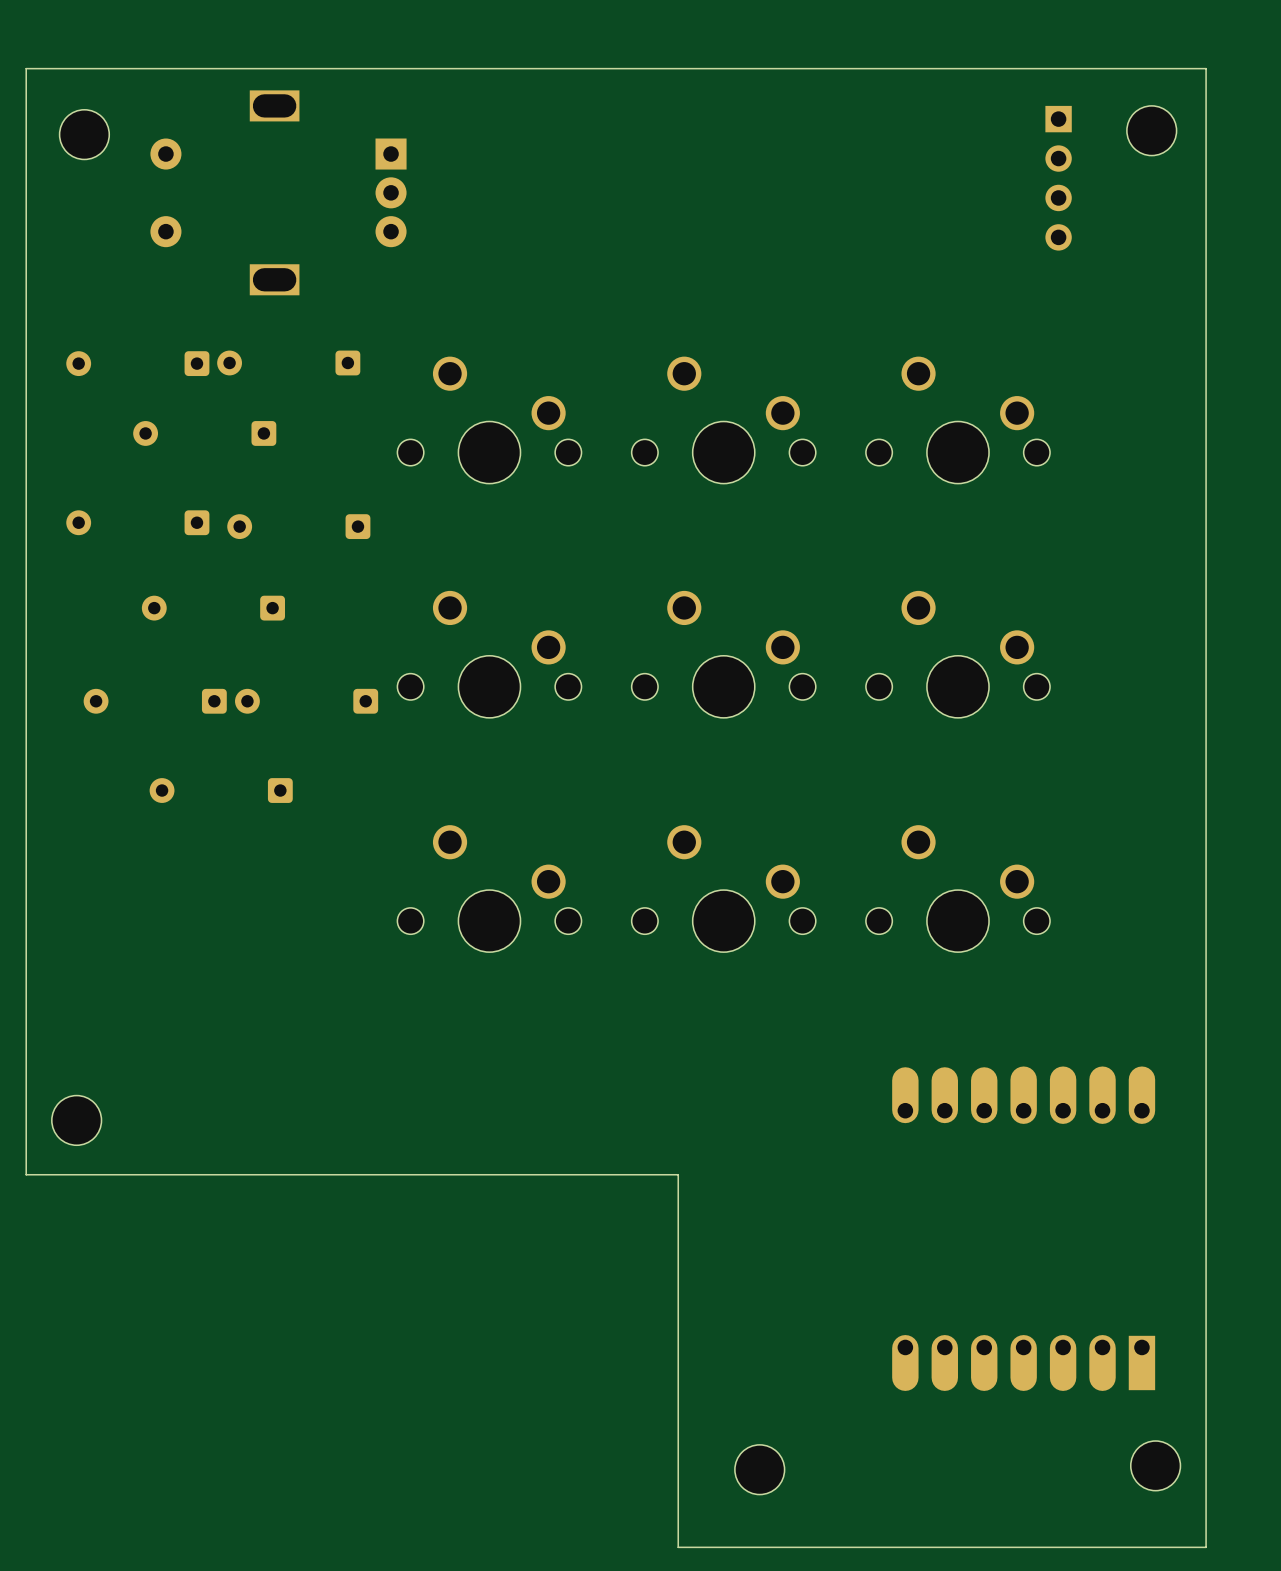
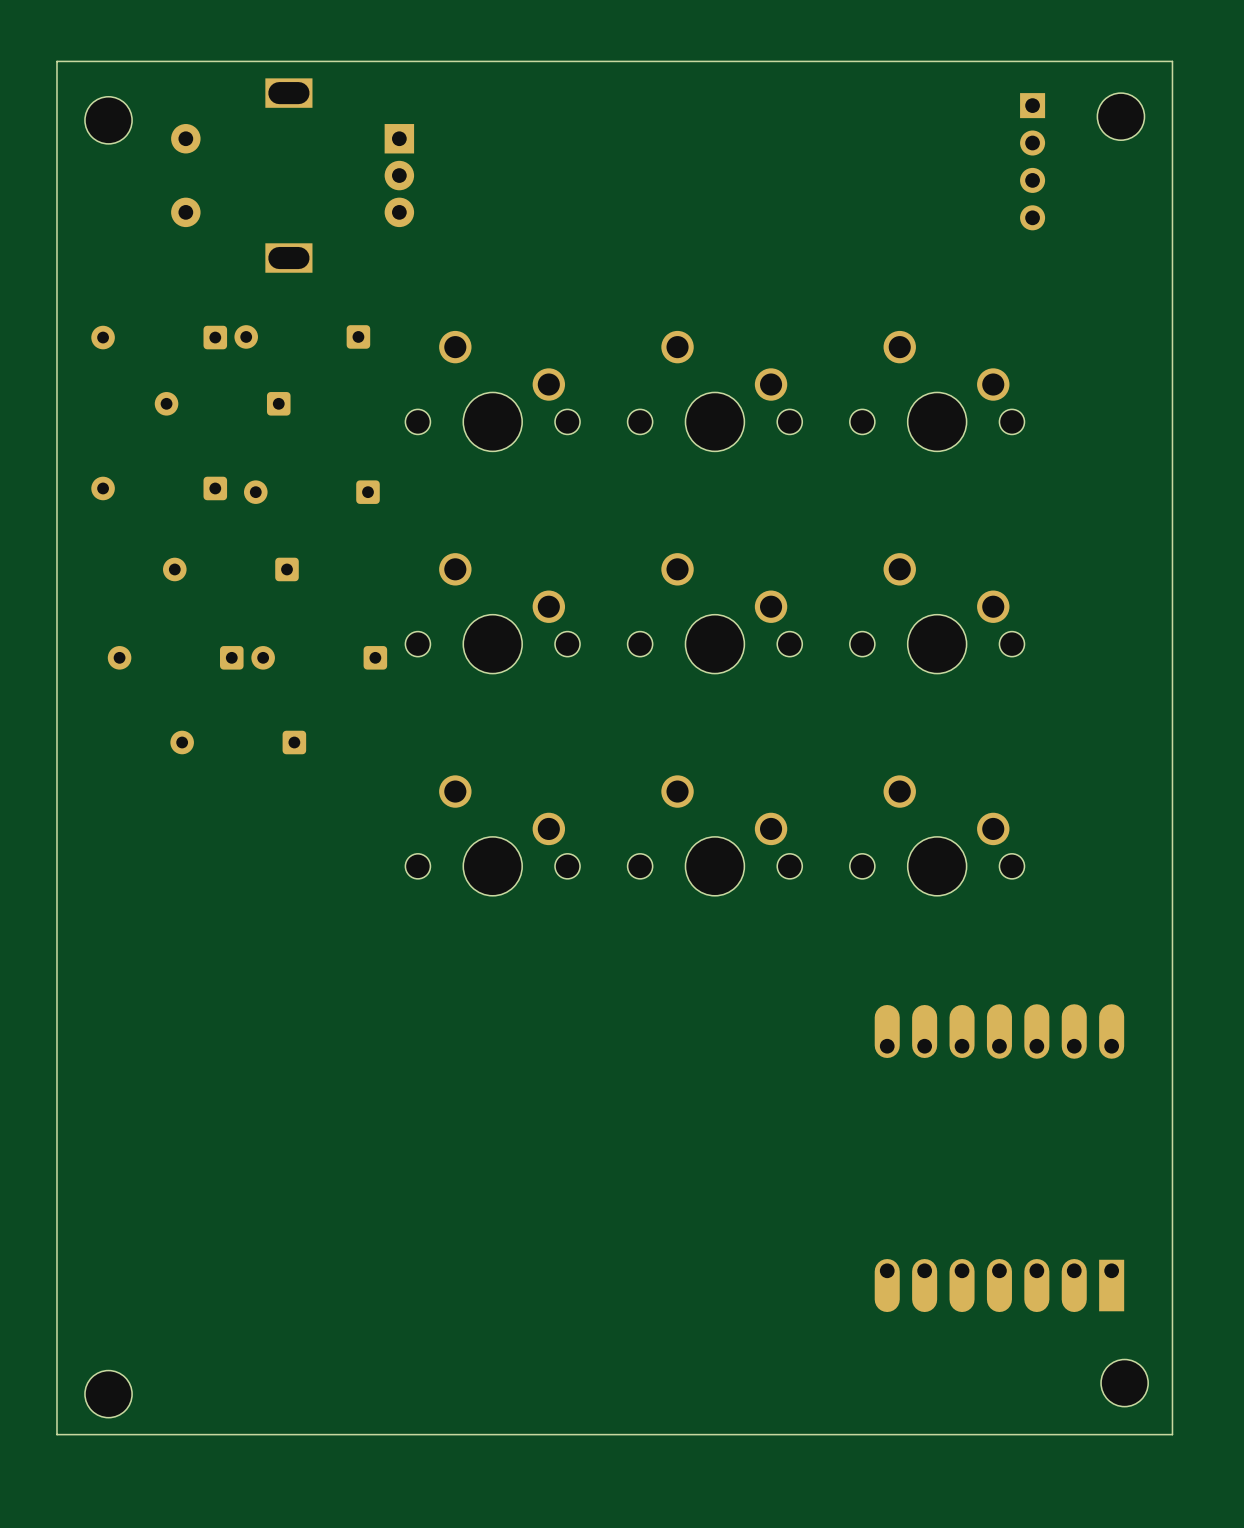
board edge: (1206, 72) (1206, 68) (26, 68) (26, 1174) (678, 1174) (678, 1547) (1206, 1547) (1206, 1520) -> (1172, 61) (56, 61) (56, 1434) (1172, 1434)
part: (76, 1120) -> none
part: (759, 1469) -> none
part: none -> (108, 1394)

